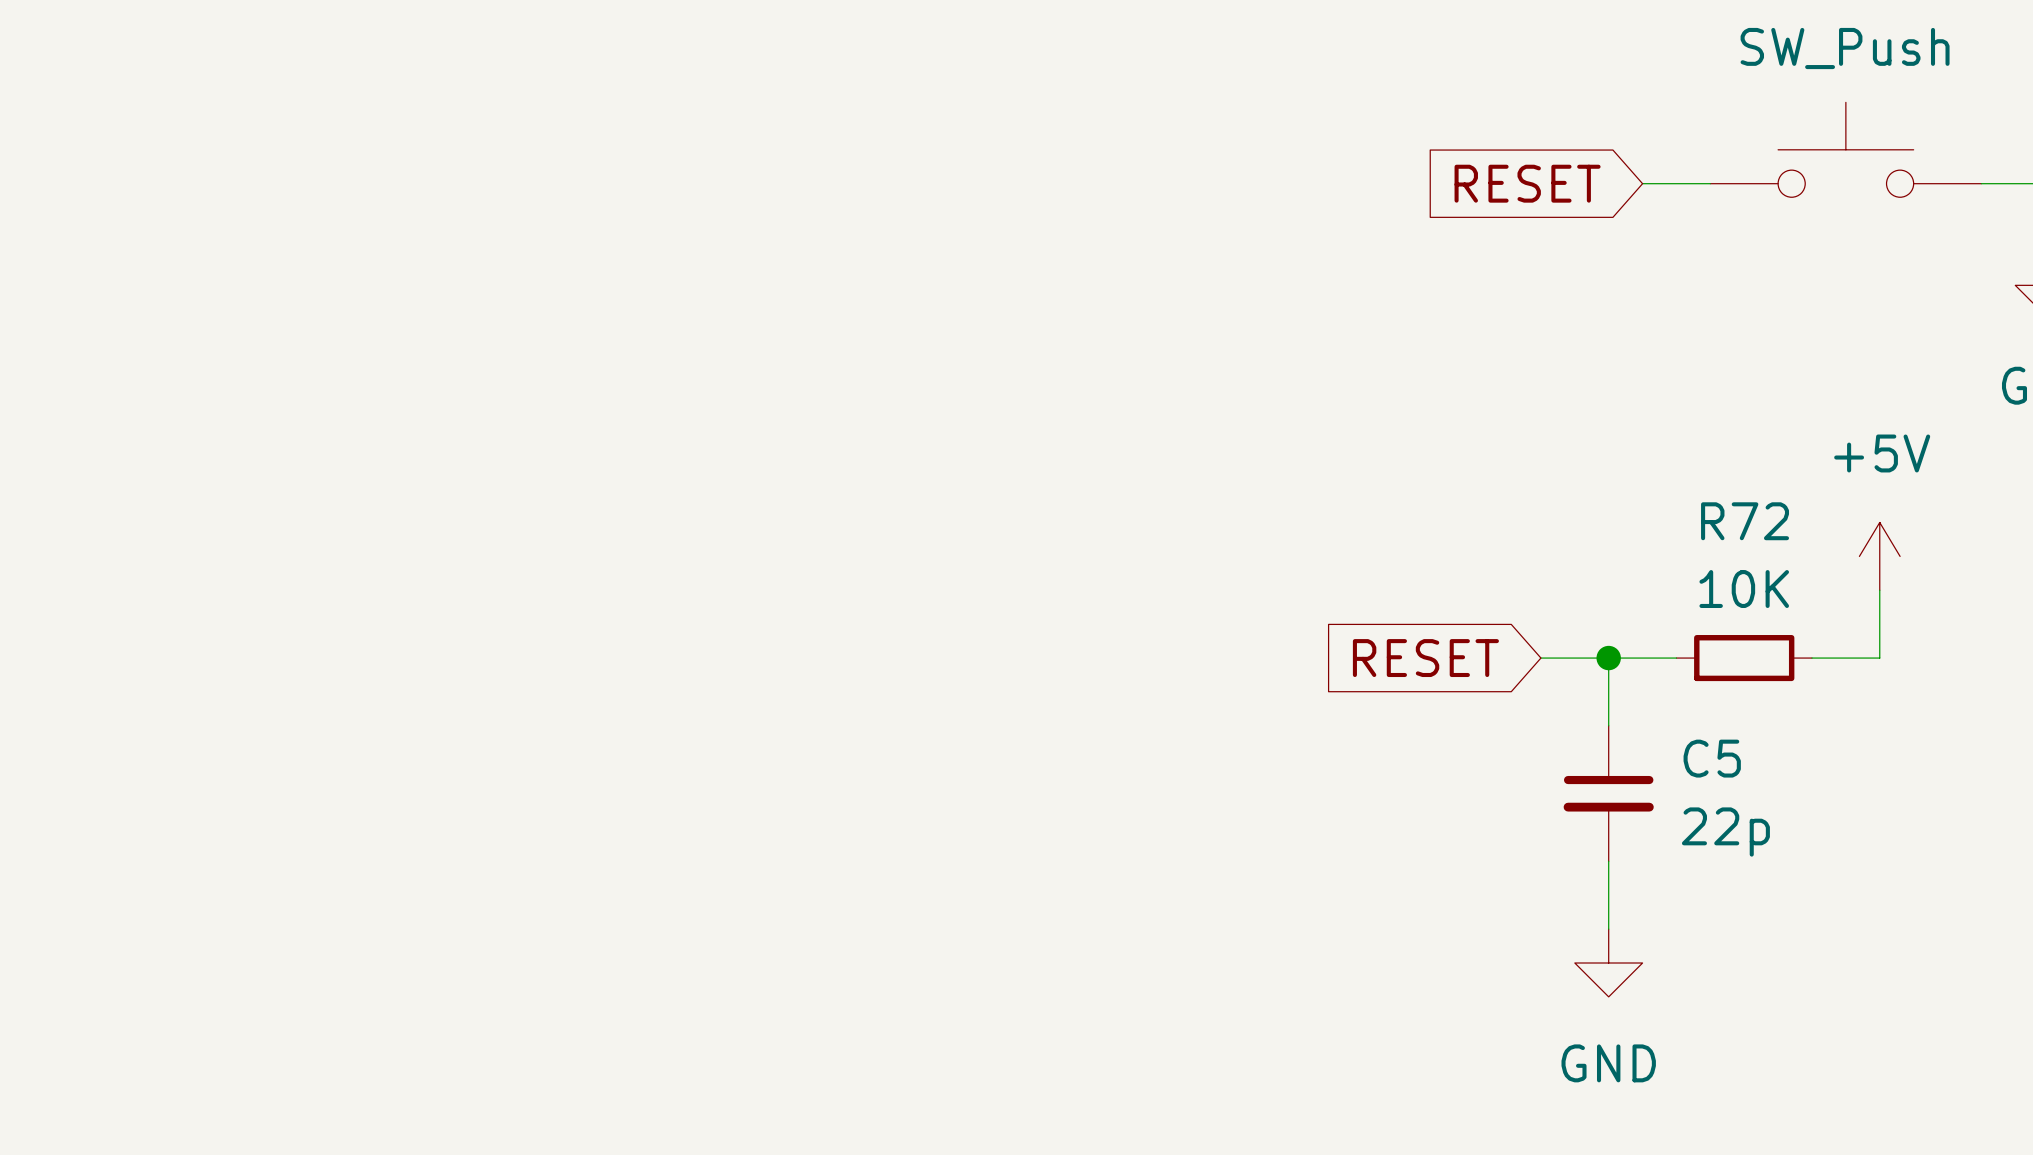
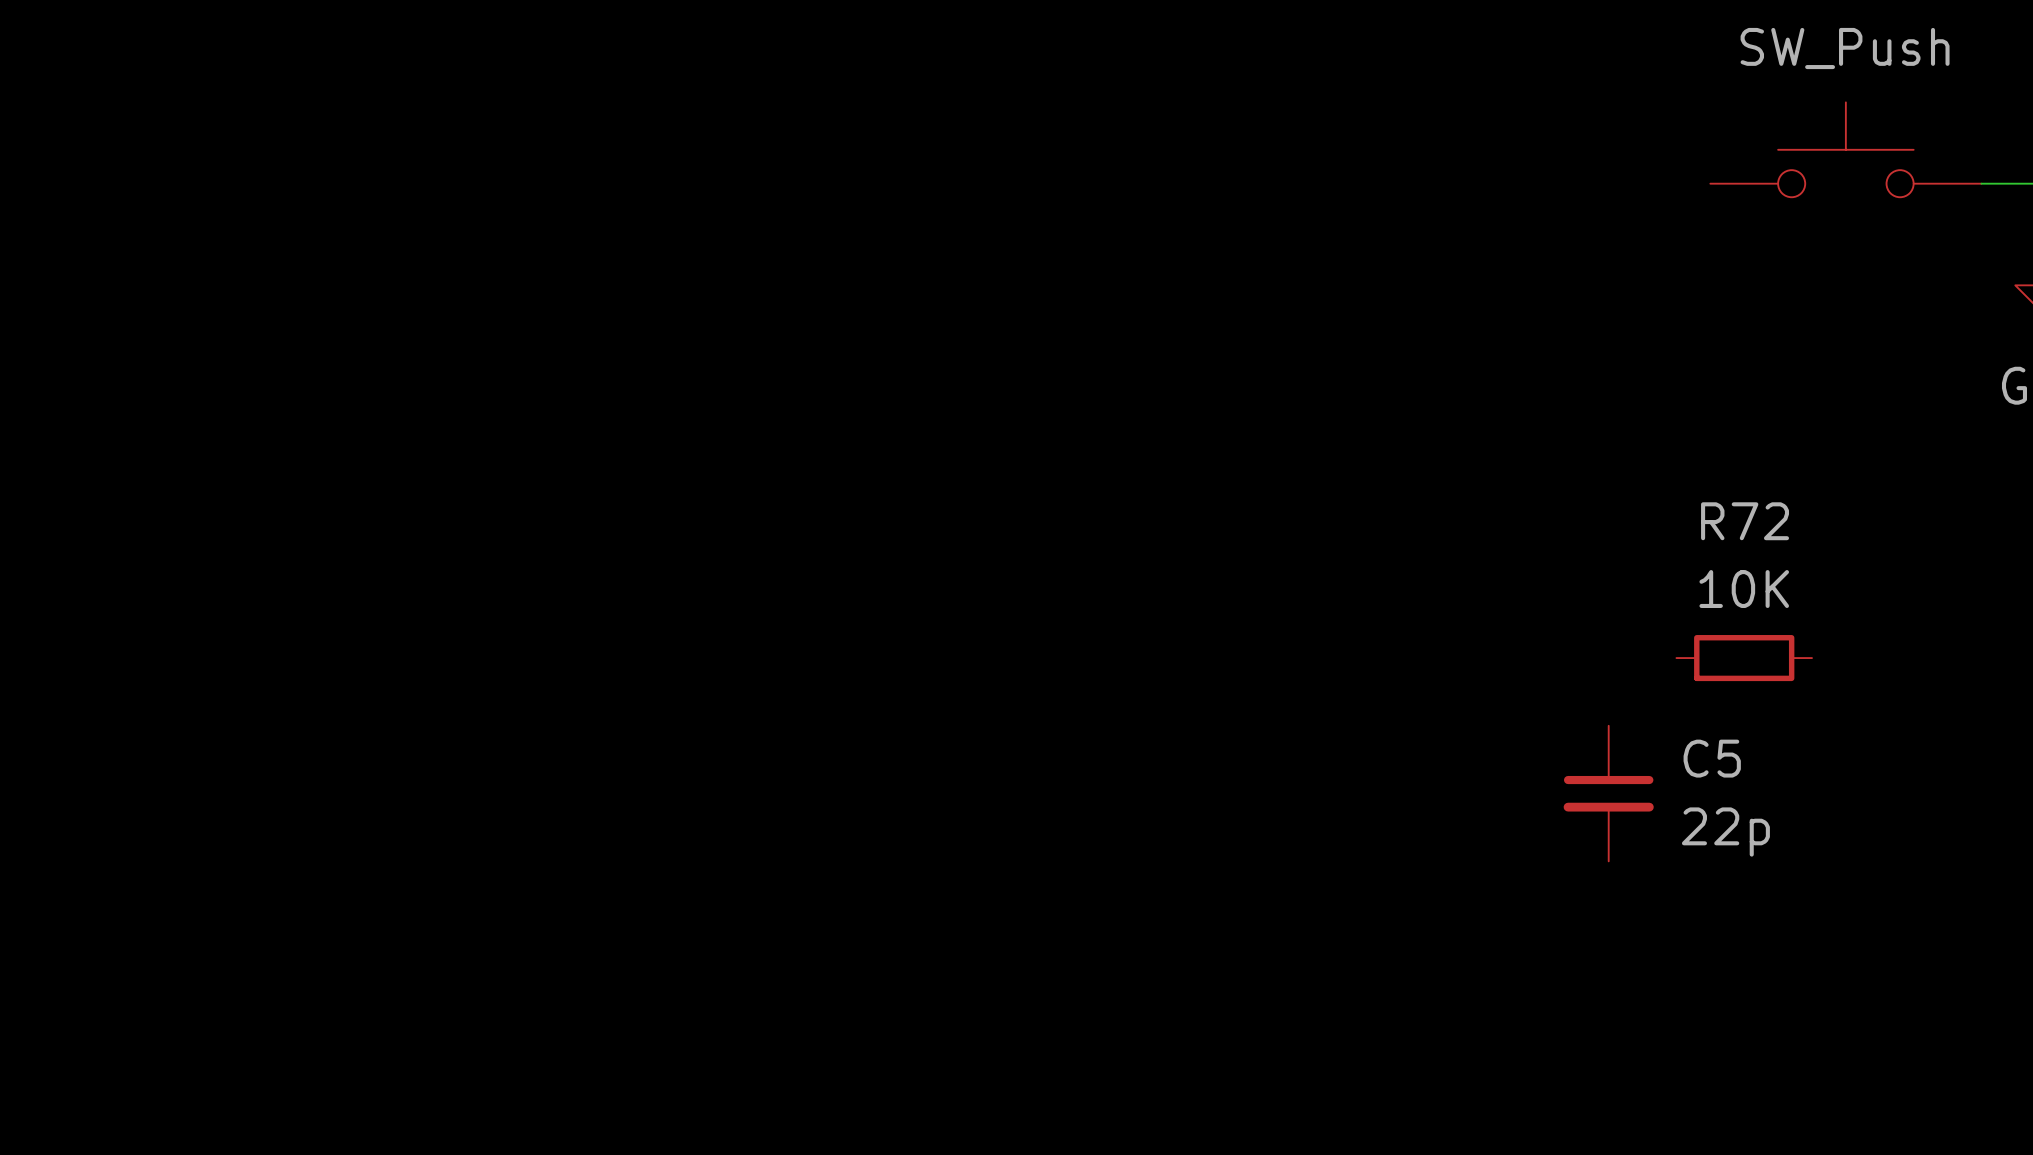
global label: RESET (1527, 183) -> none
wire: (1642, 183) (1710, 183) -> none
power symbol: +5V (1879, 556) -> none
wire: (1879, 590) (1879, 658) (1811, 658) -> none
global label: RESET (1425, 658) -> none
wire: (1540, 658) (1676, 658) -> none
wire: (1608, 658) (1608, 725) -> none
junction: (1608, 658) -> none
wire: (1608, 861) (1608, 929) -> none
power symbol: GND (1608, 963) -> none

